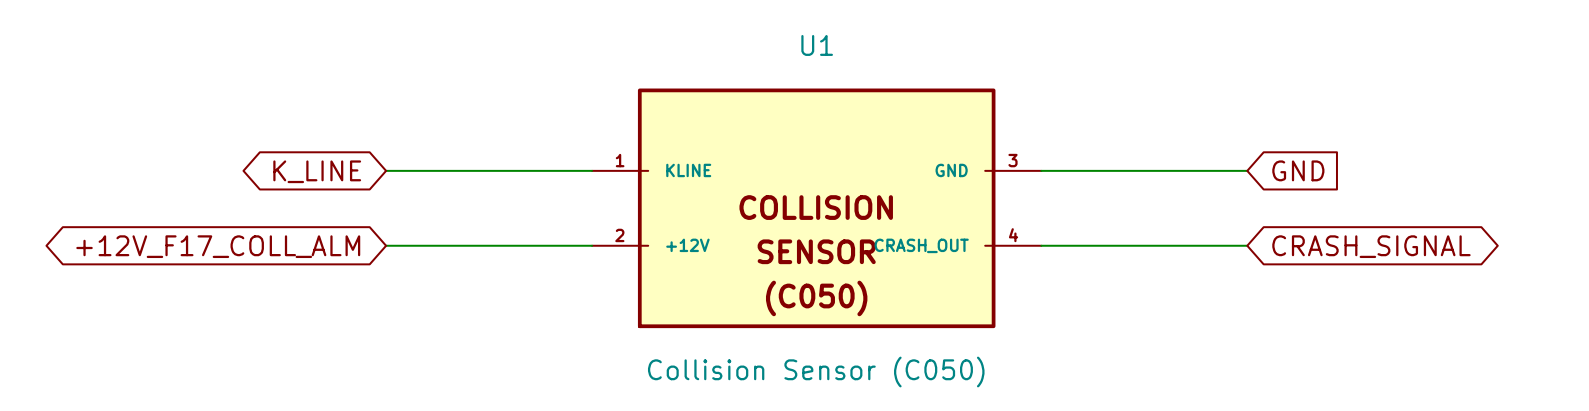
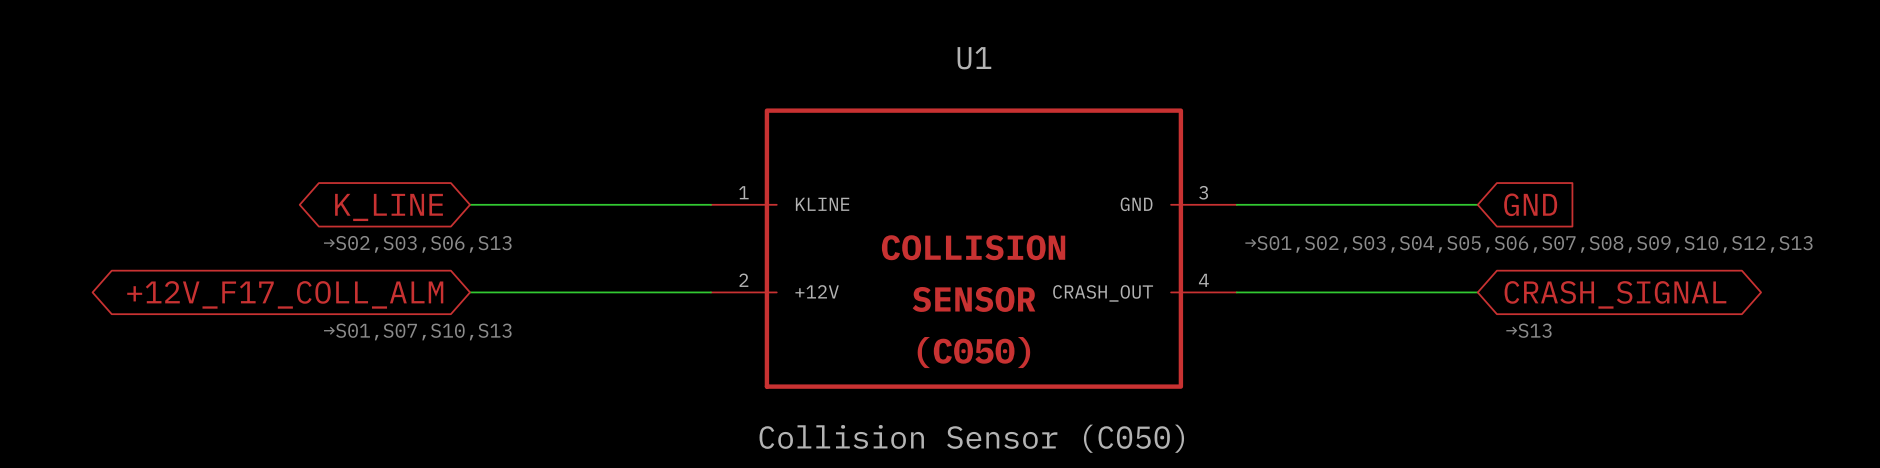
text: none -> →S02,S03,S06,S13 (417, 244)
text: none -> →S01,S02,S03,S04,S05,S06,S07,S08,S09,S10,S12,S13 (1528, 244)
text: none -> →S13 (1528, 330)
text: none -> →S01,S07,S10,S13 (417, 331)

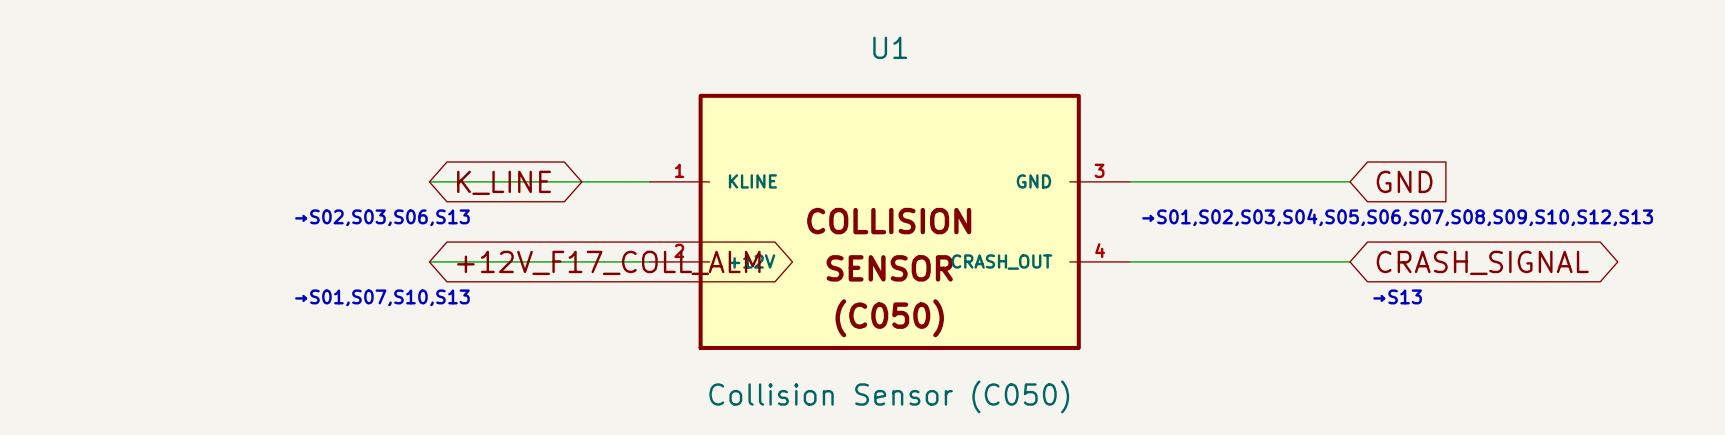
global label rotation: 0° (389, 207) -> 180° (504, 182)
global label position: K_LINE (389, 207) -> K_LINE (504, 182)
global label rotation: 0° (285, 294) -> 180° (608, 262)
global label position: +12V_F17_COLL_ALM (285, 294) -> +12V_F17_COLL_ALM (608, 262)

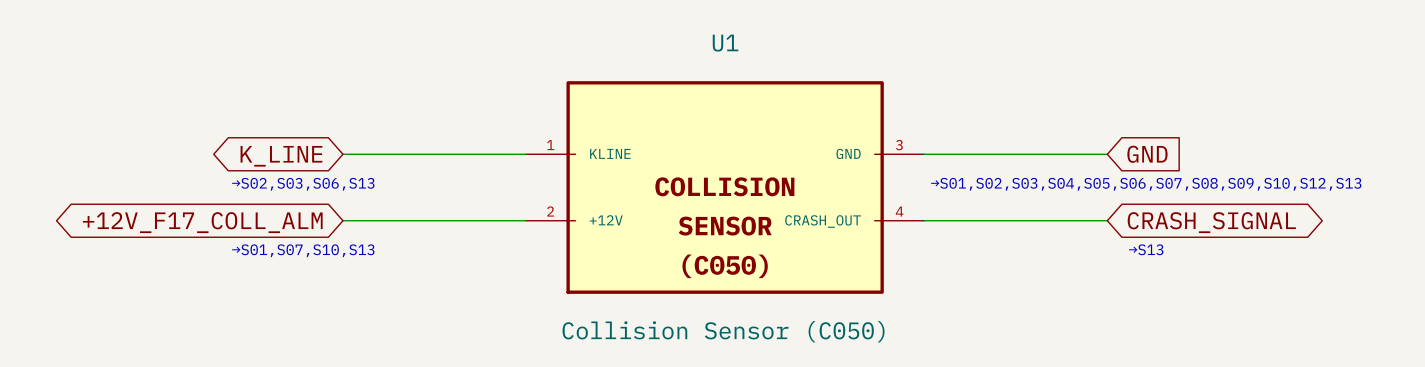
global label rotation: 0° (504, 182) -> 180° (281, 156)
global label rotation: 0° (608, 262) -> 180° (202, 222)
global label position: +12V_F17_COLL_ALM (608, 262) -> +12V_F17_COLL_ALM (202, 222)

